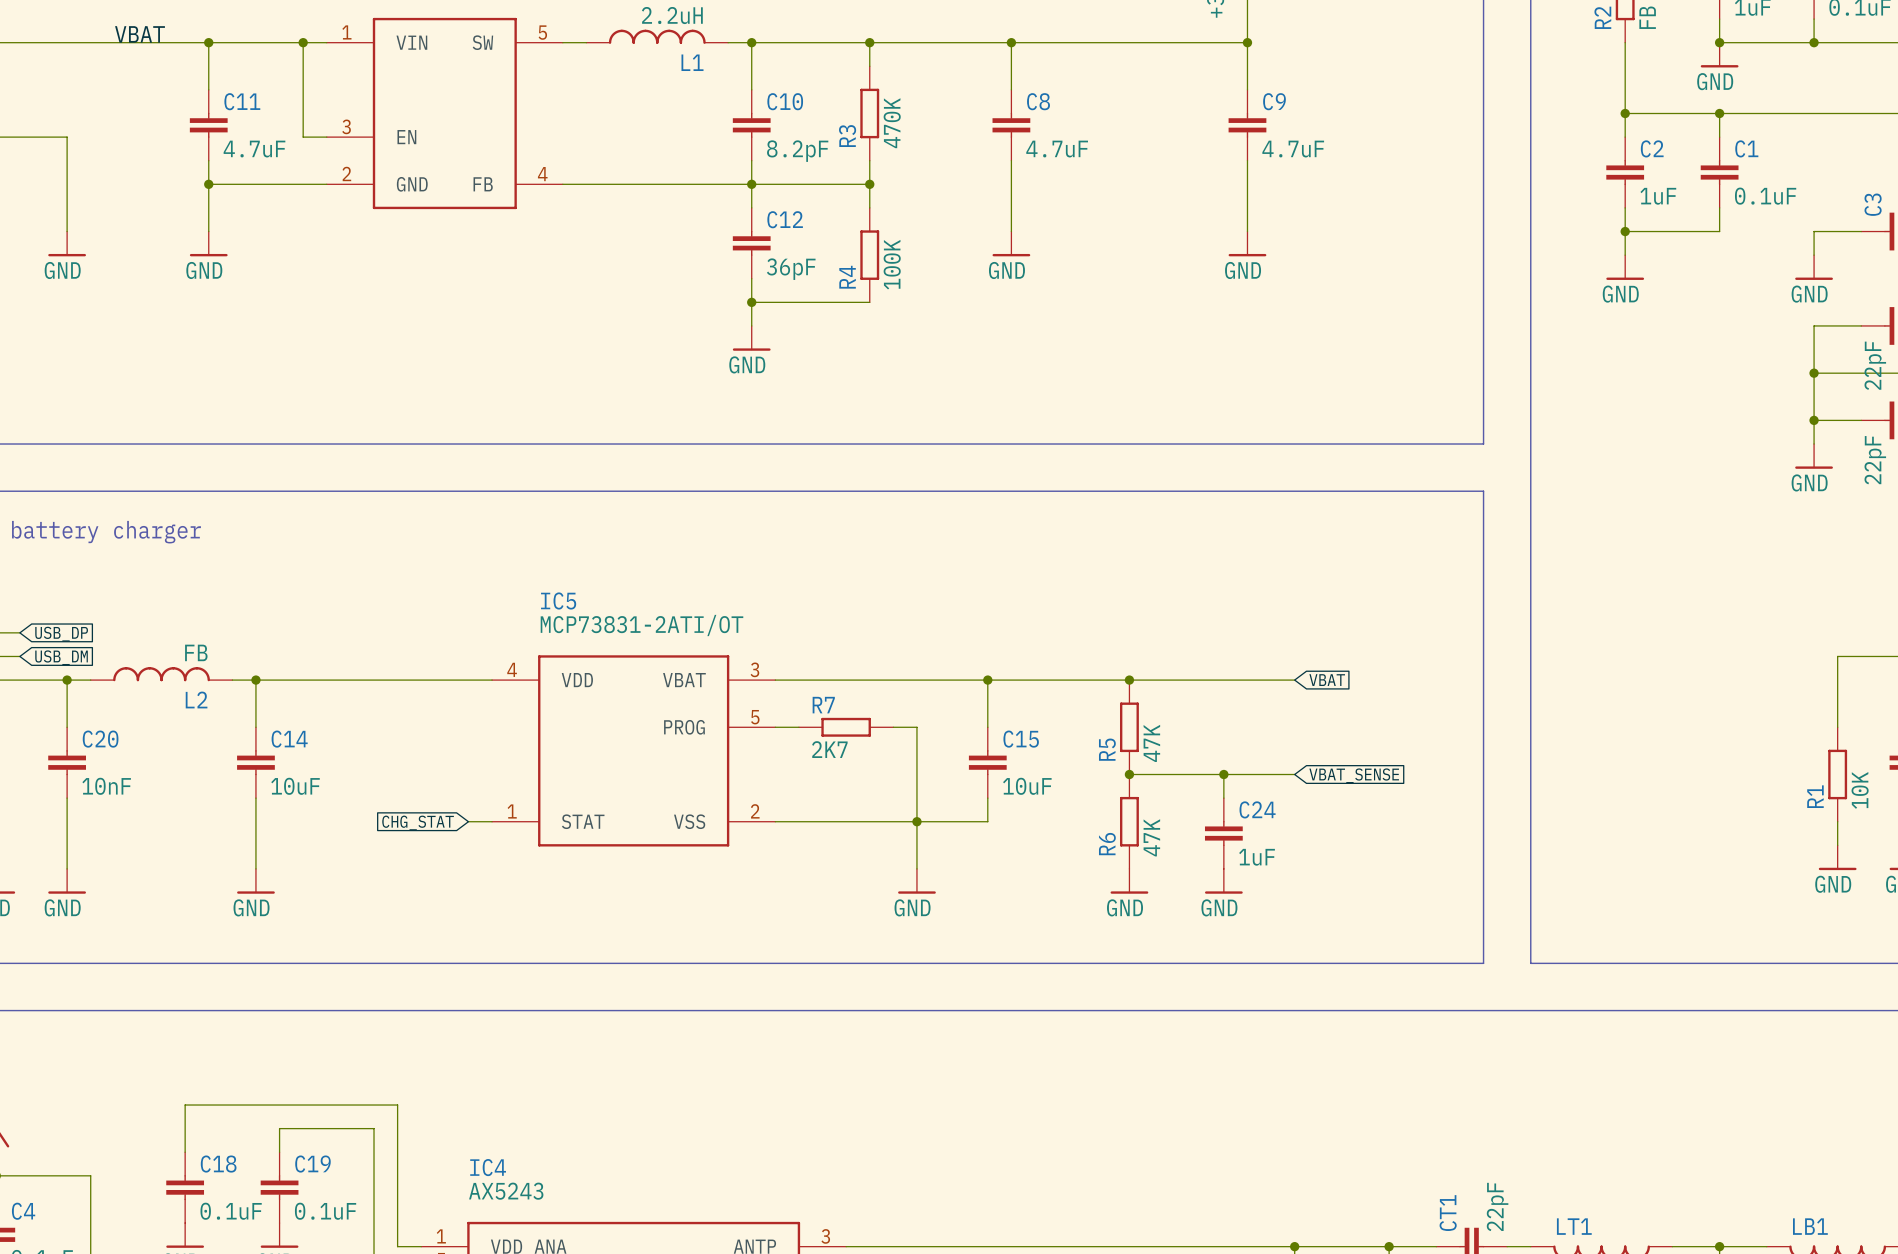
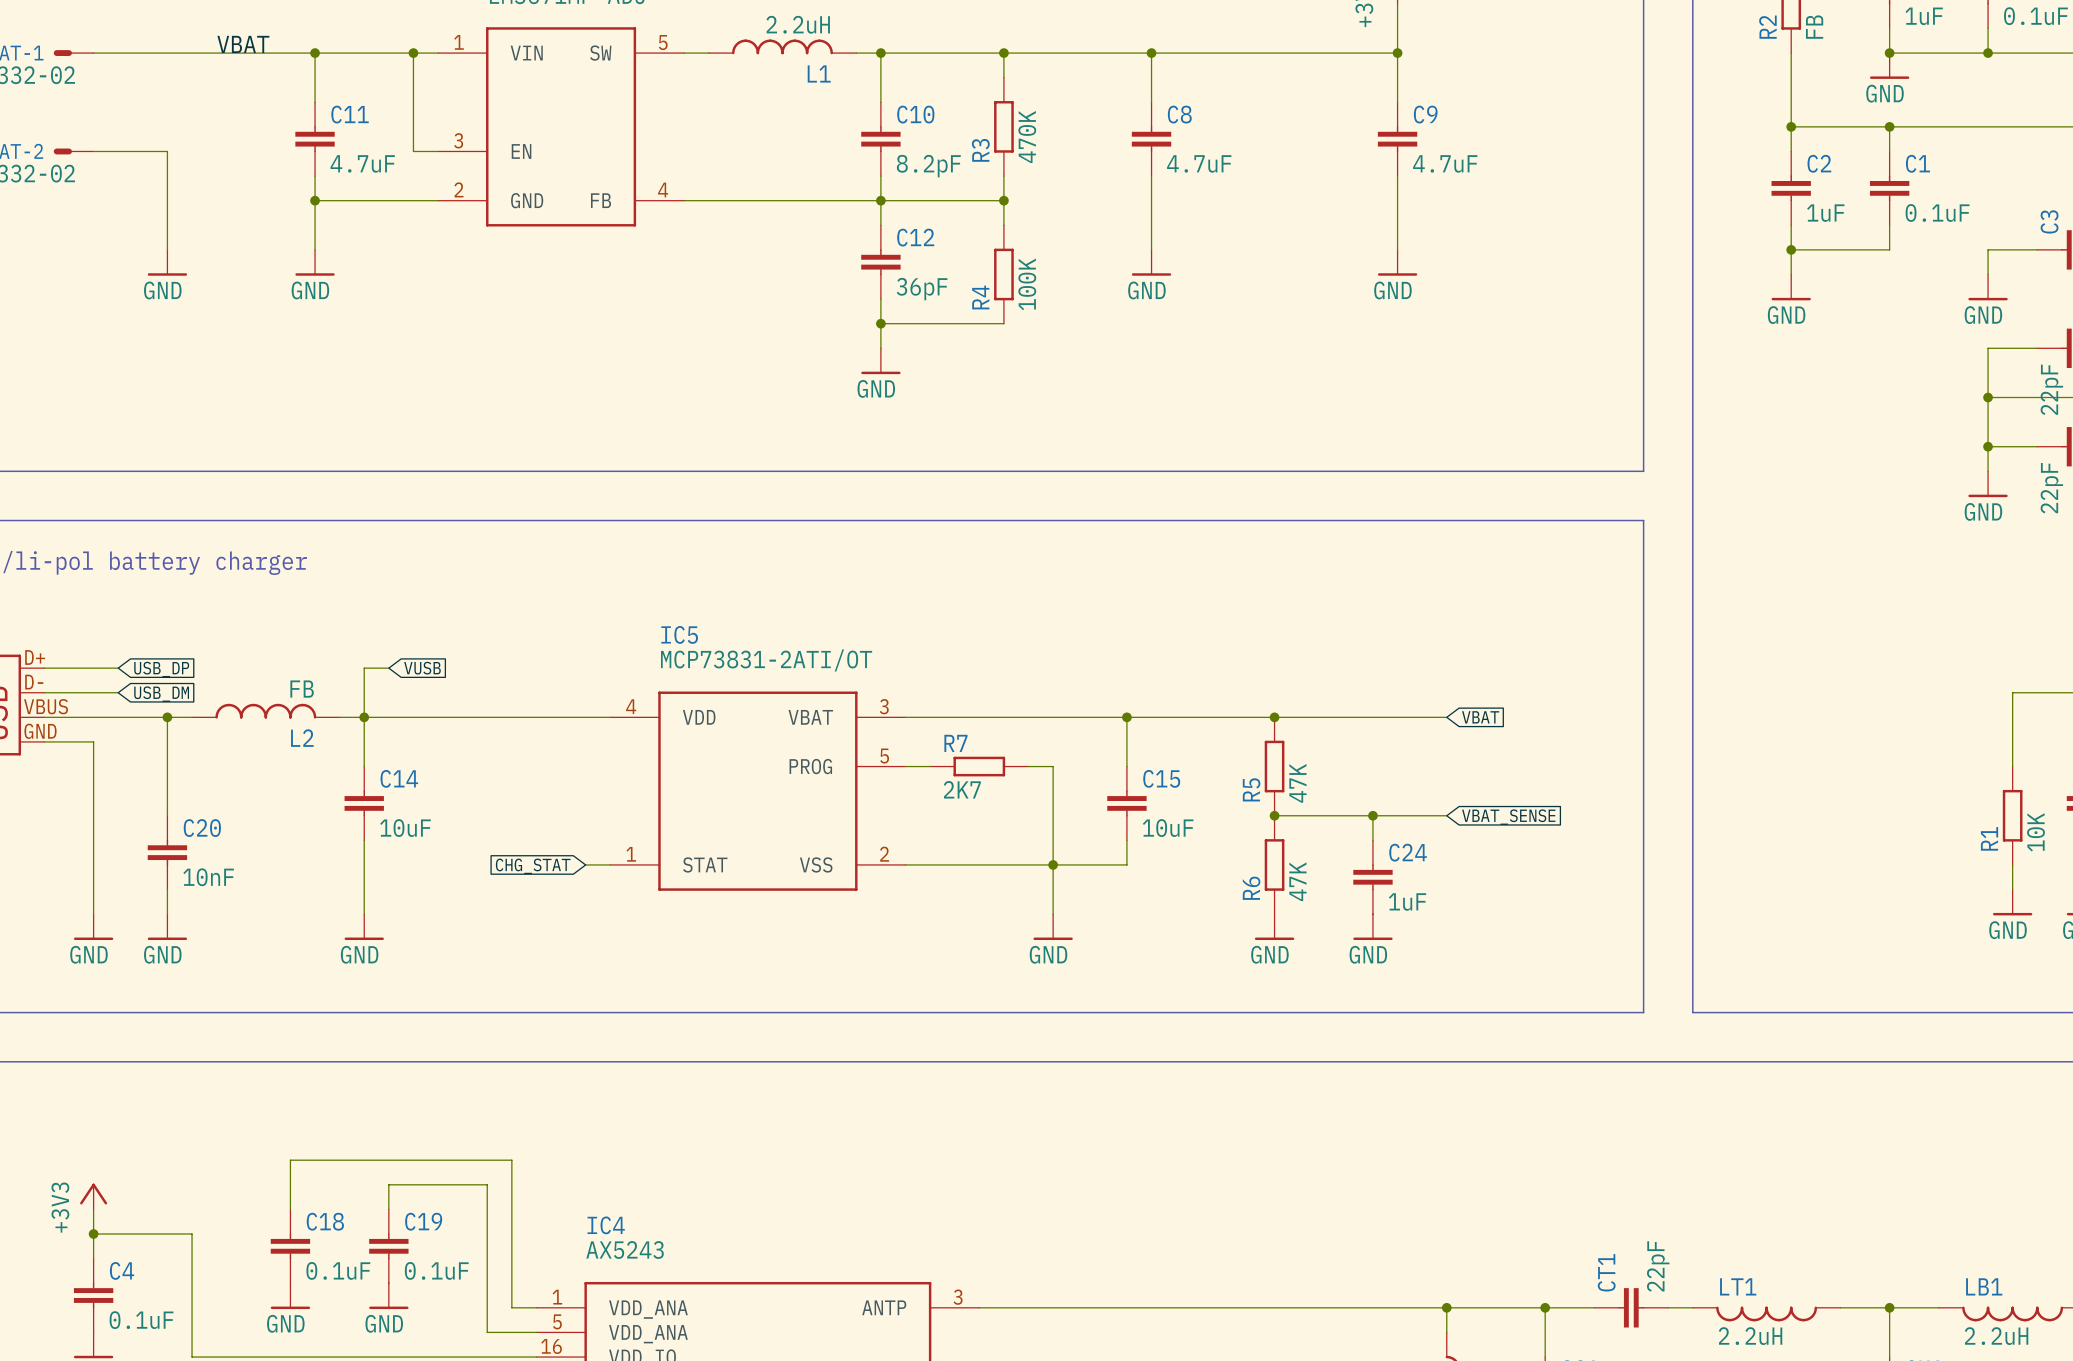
wire: none -> (388, 668) (364, 668) (364, 717)
global label: none -> VUSB (422, 668)
C20 position: (67, 762) -> (167, 852)

